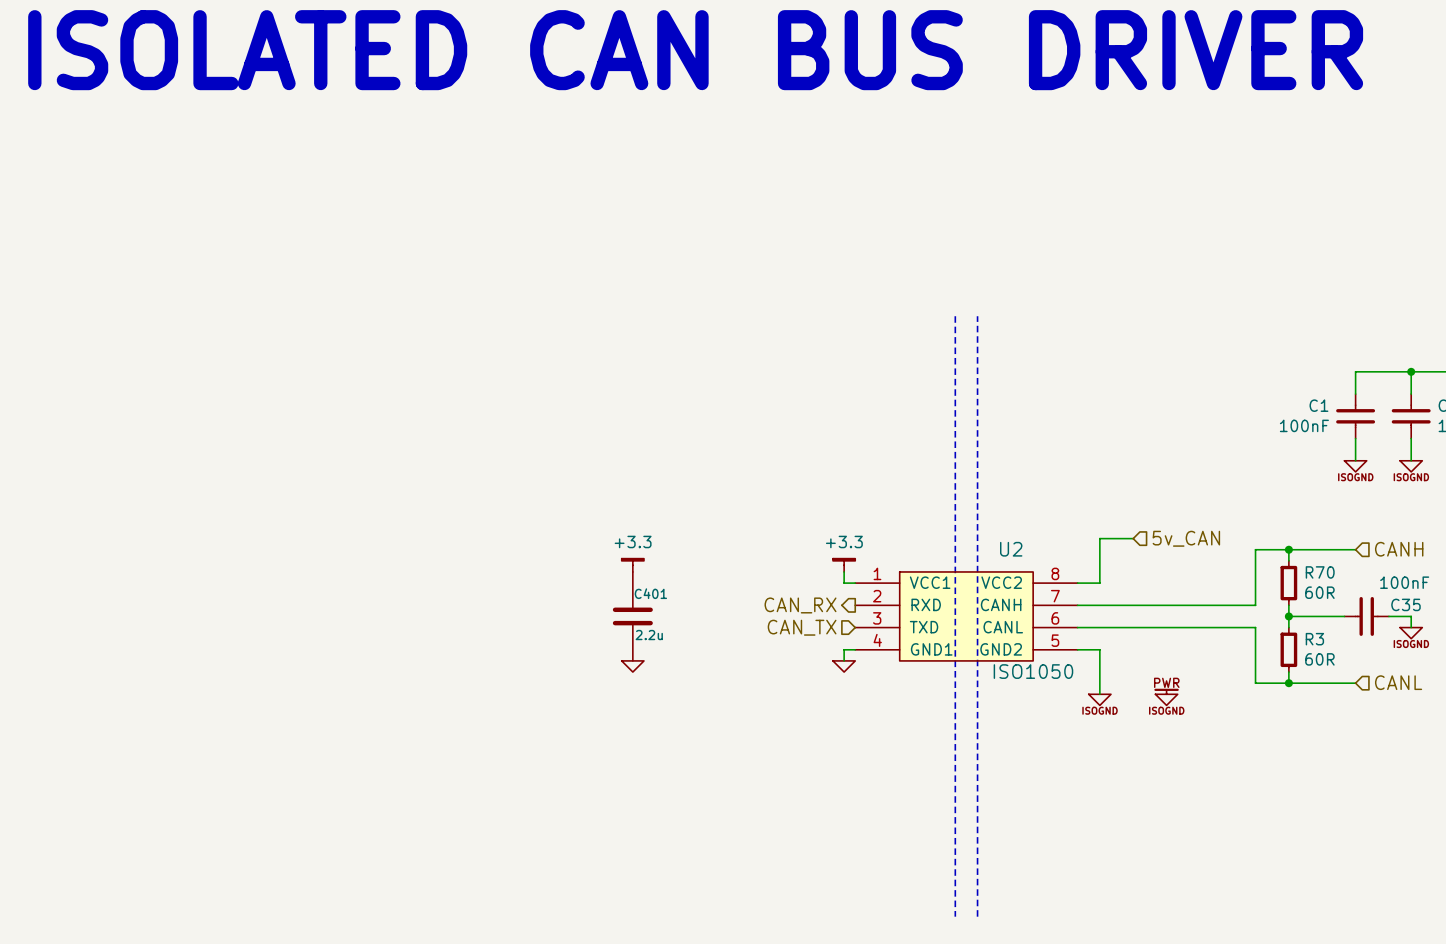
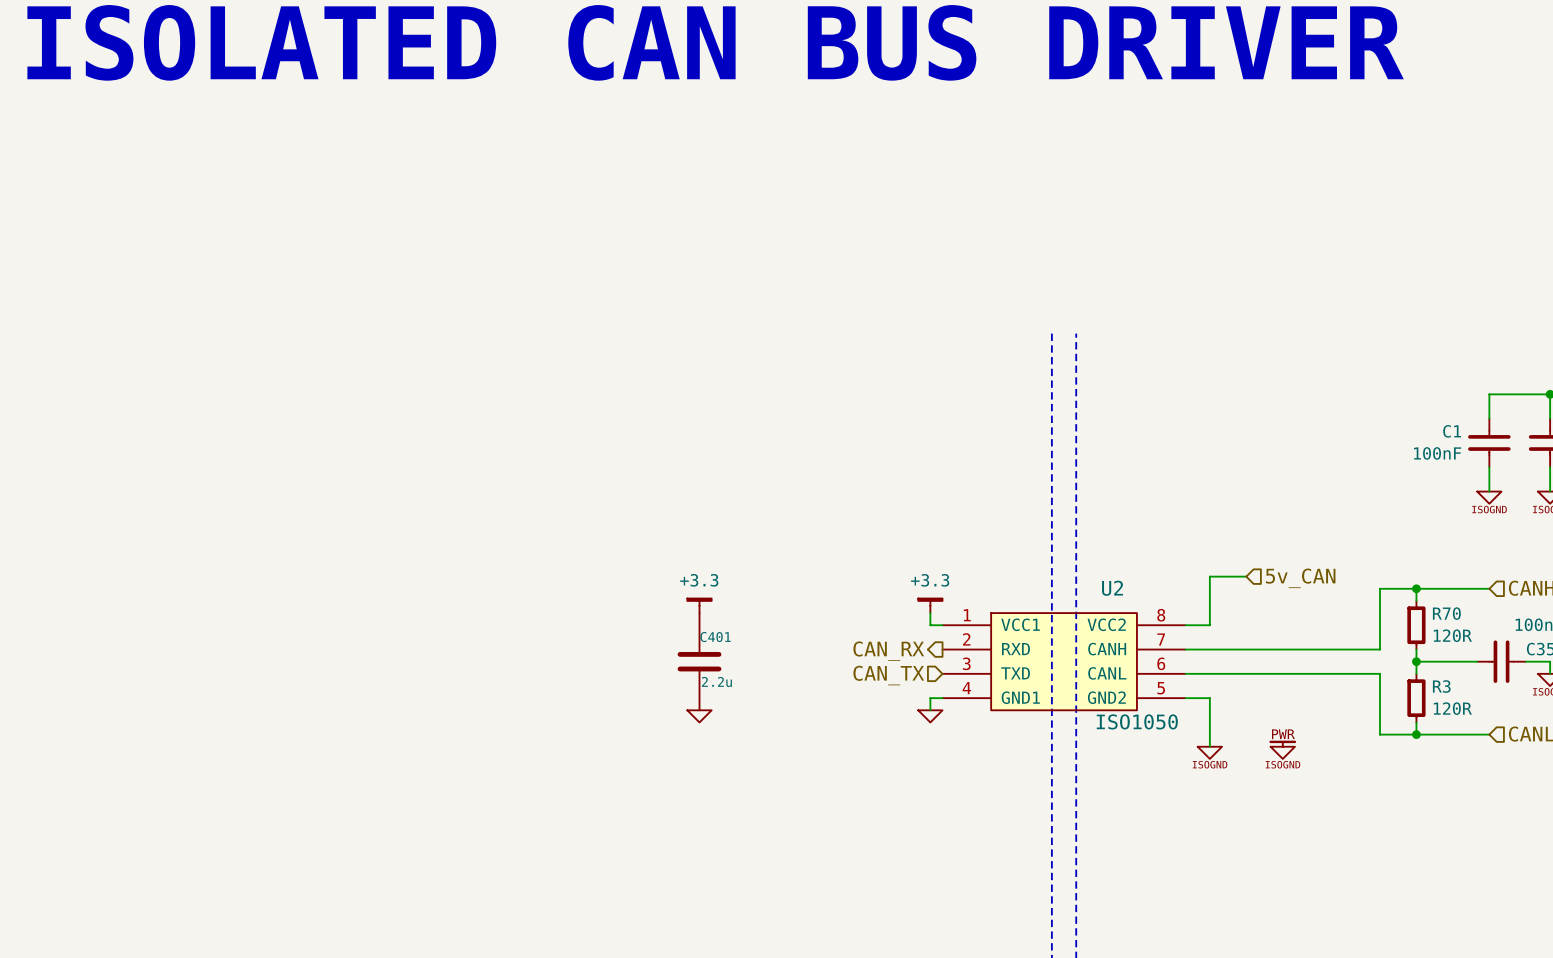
R70 value: 60R (1319, 592) -> 120R (1452, 635)
R3 value: 60R (1319, 659) -> 120R (1452, 708)

